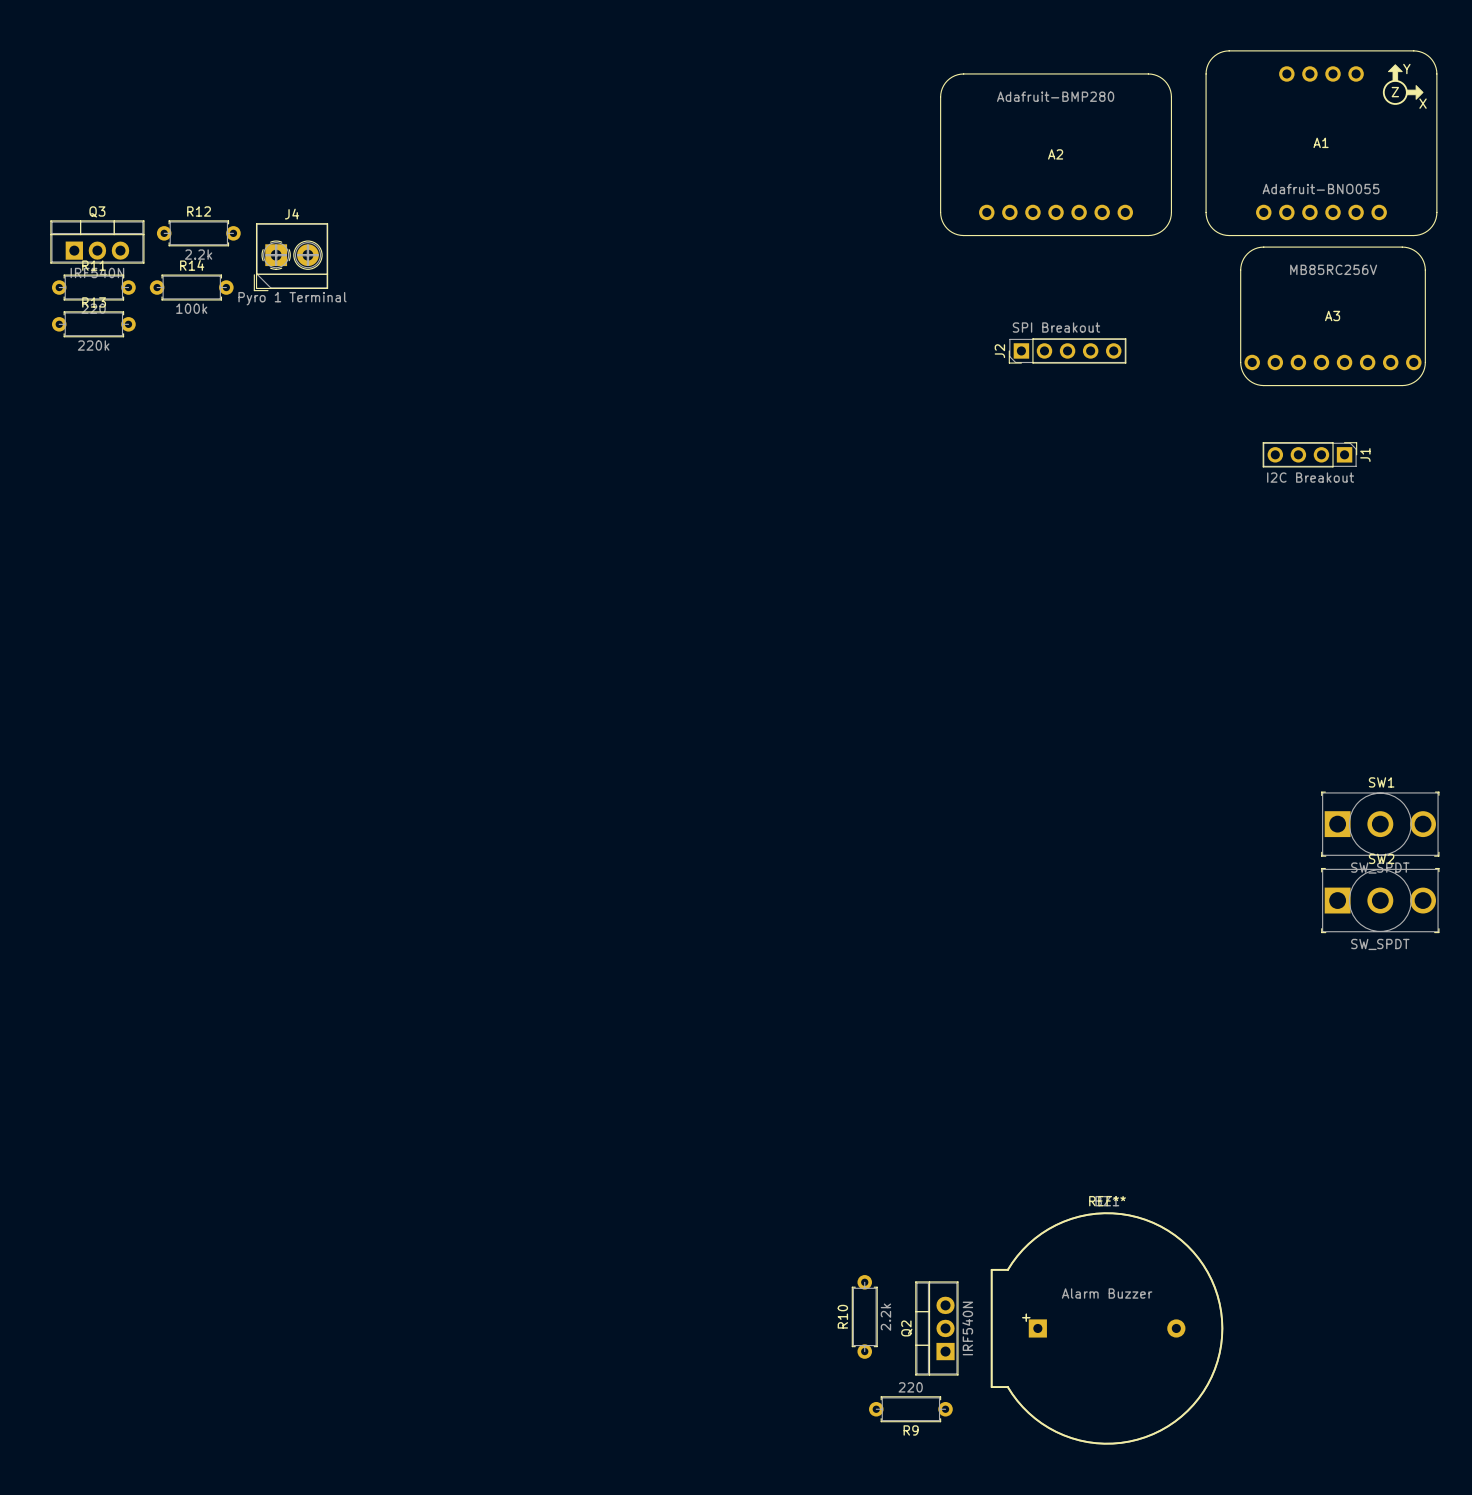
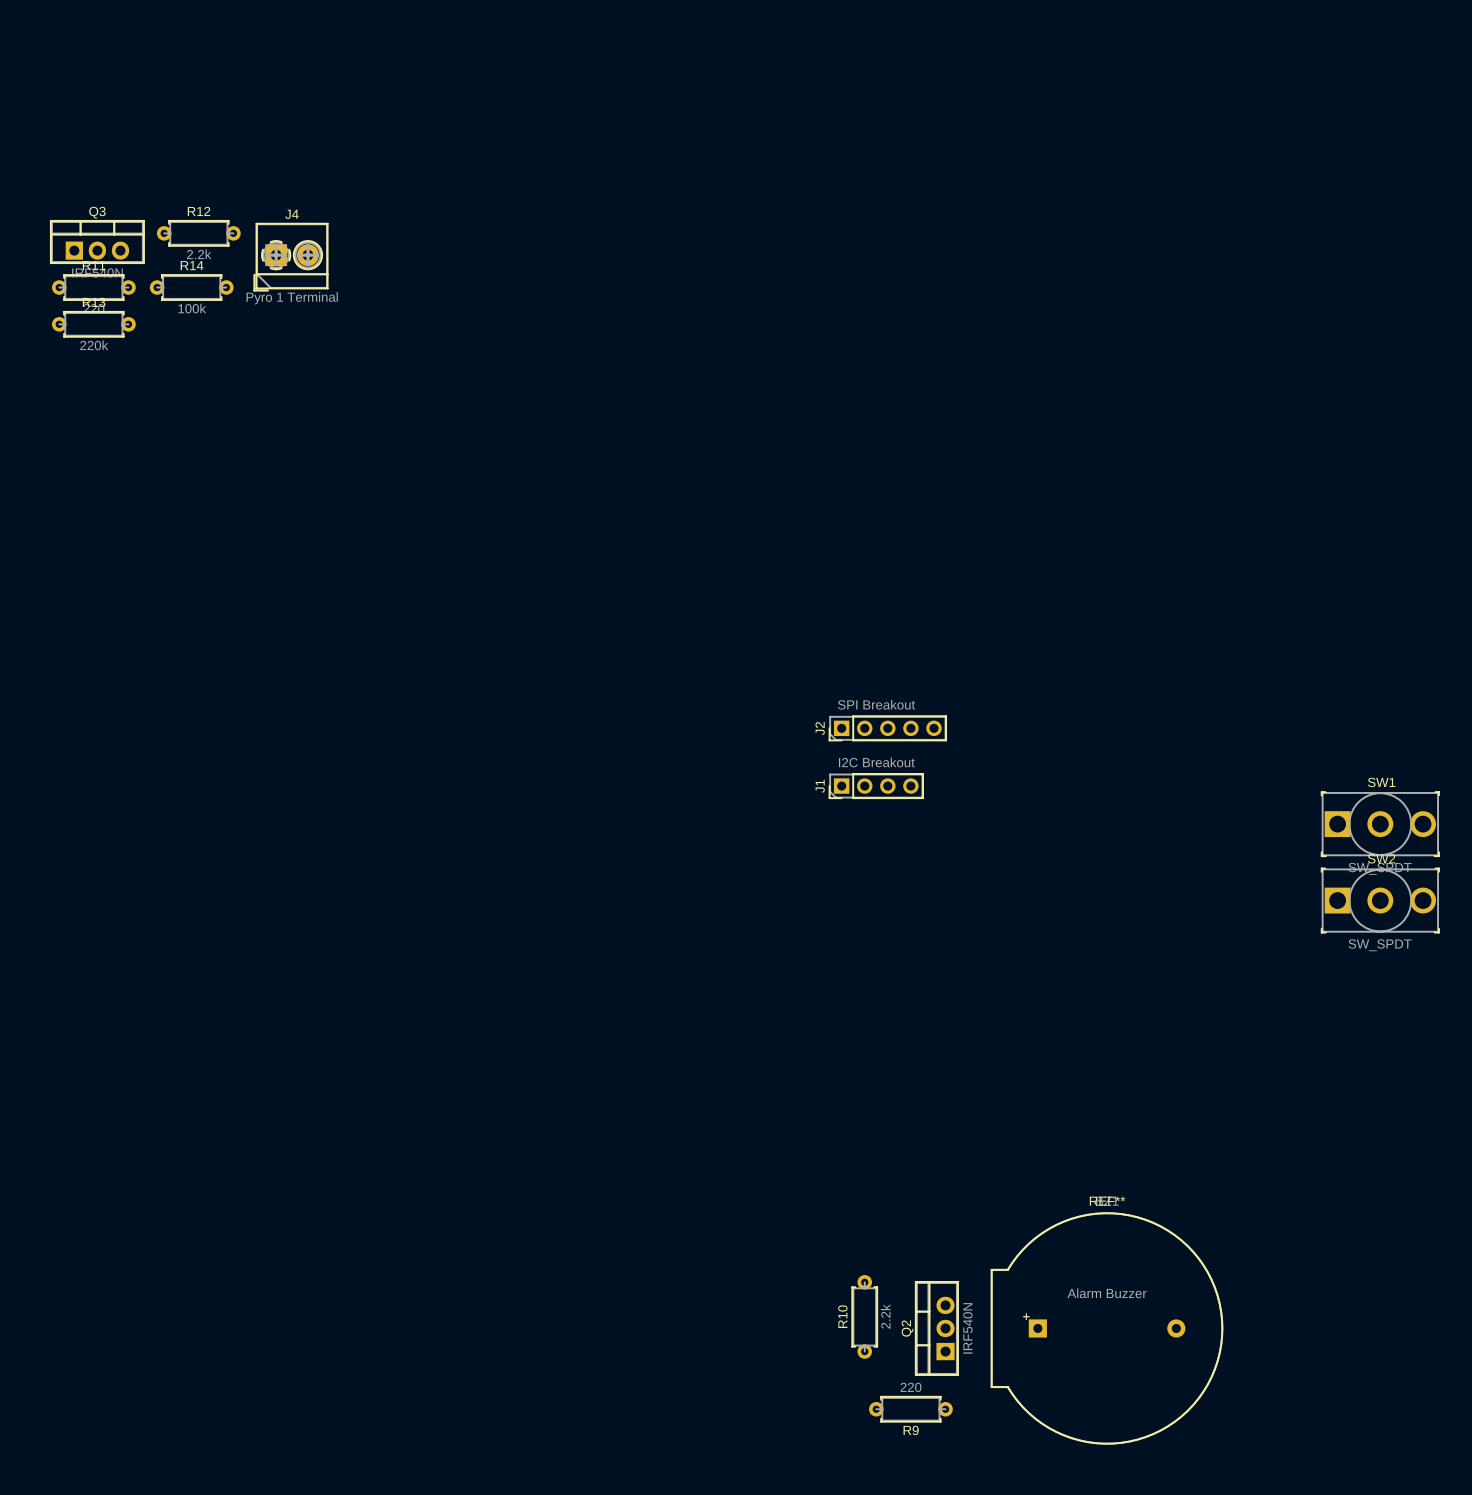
A1: Adafruit-BNO055 (1321, 143) -> none
A2: Adafruit-BMP280 (1056, 154) -> none
A3: MB85RC256V (1333, 316) -> none
J2 position: (1067, 350) -> (887, 728)
J1 rotation: 0° (1309, 454) -> 180° (876, 786)
J1 position: (1309, 454) -> (876, 786)

